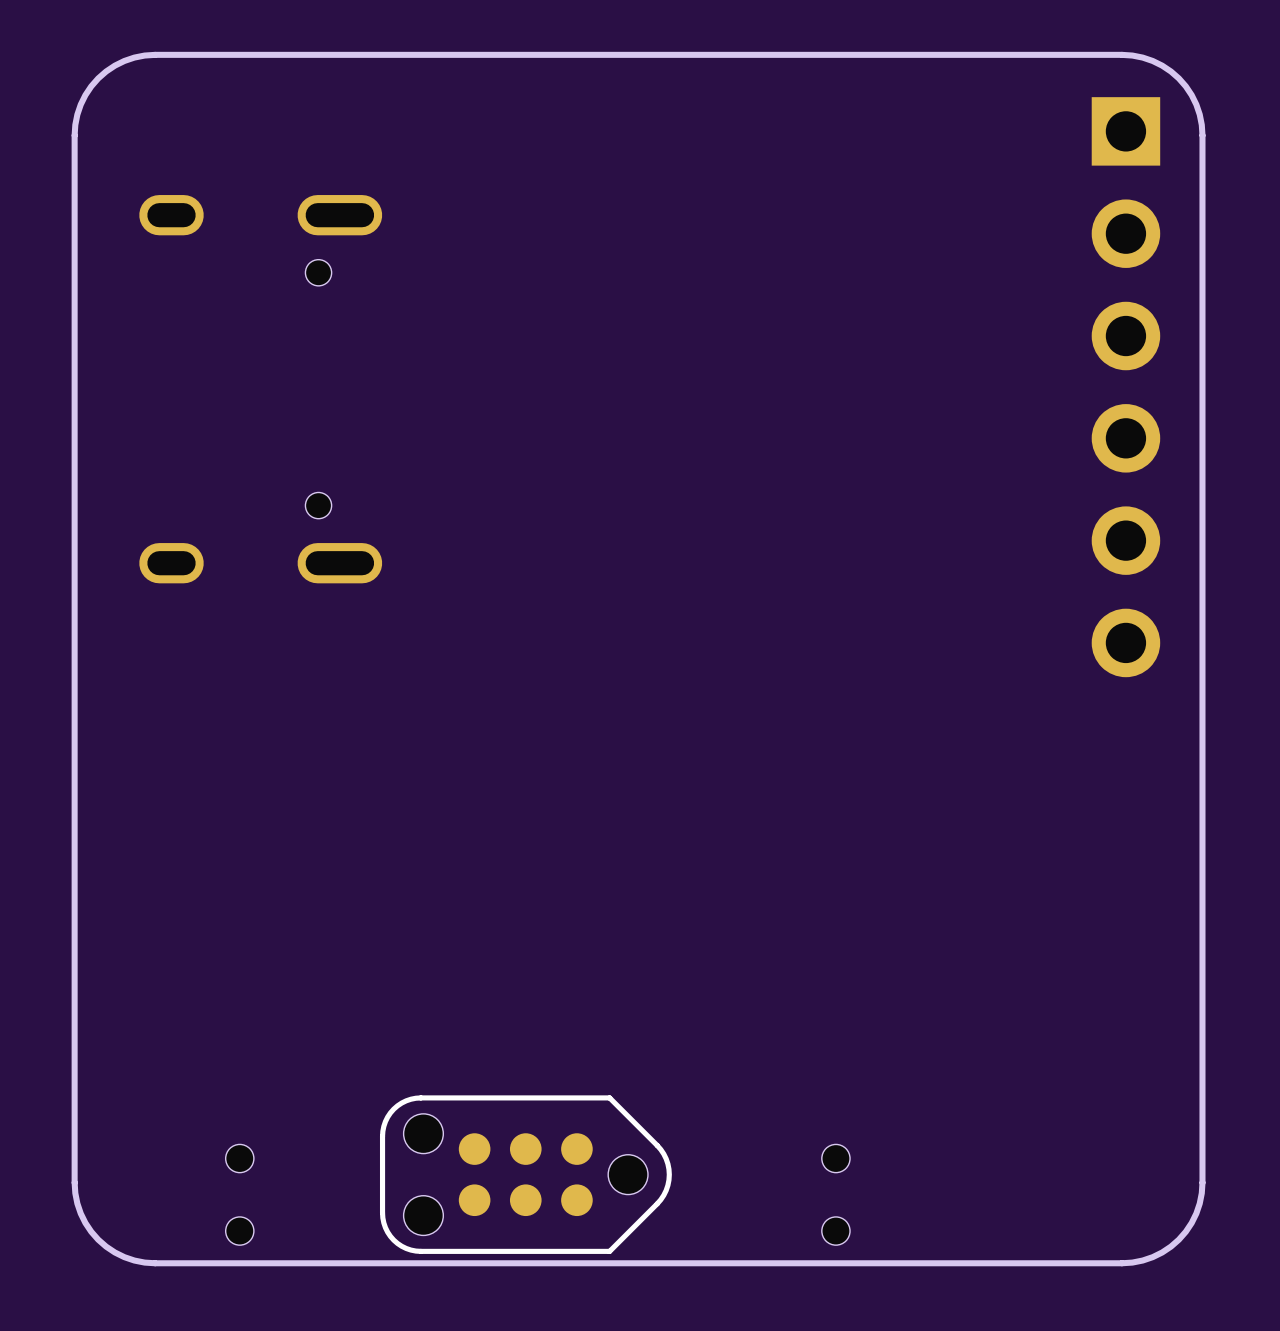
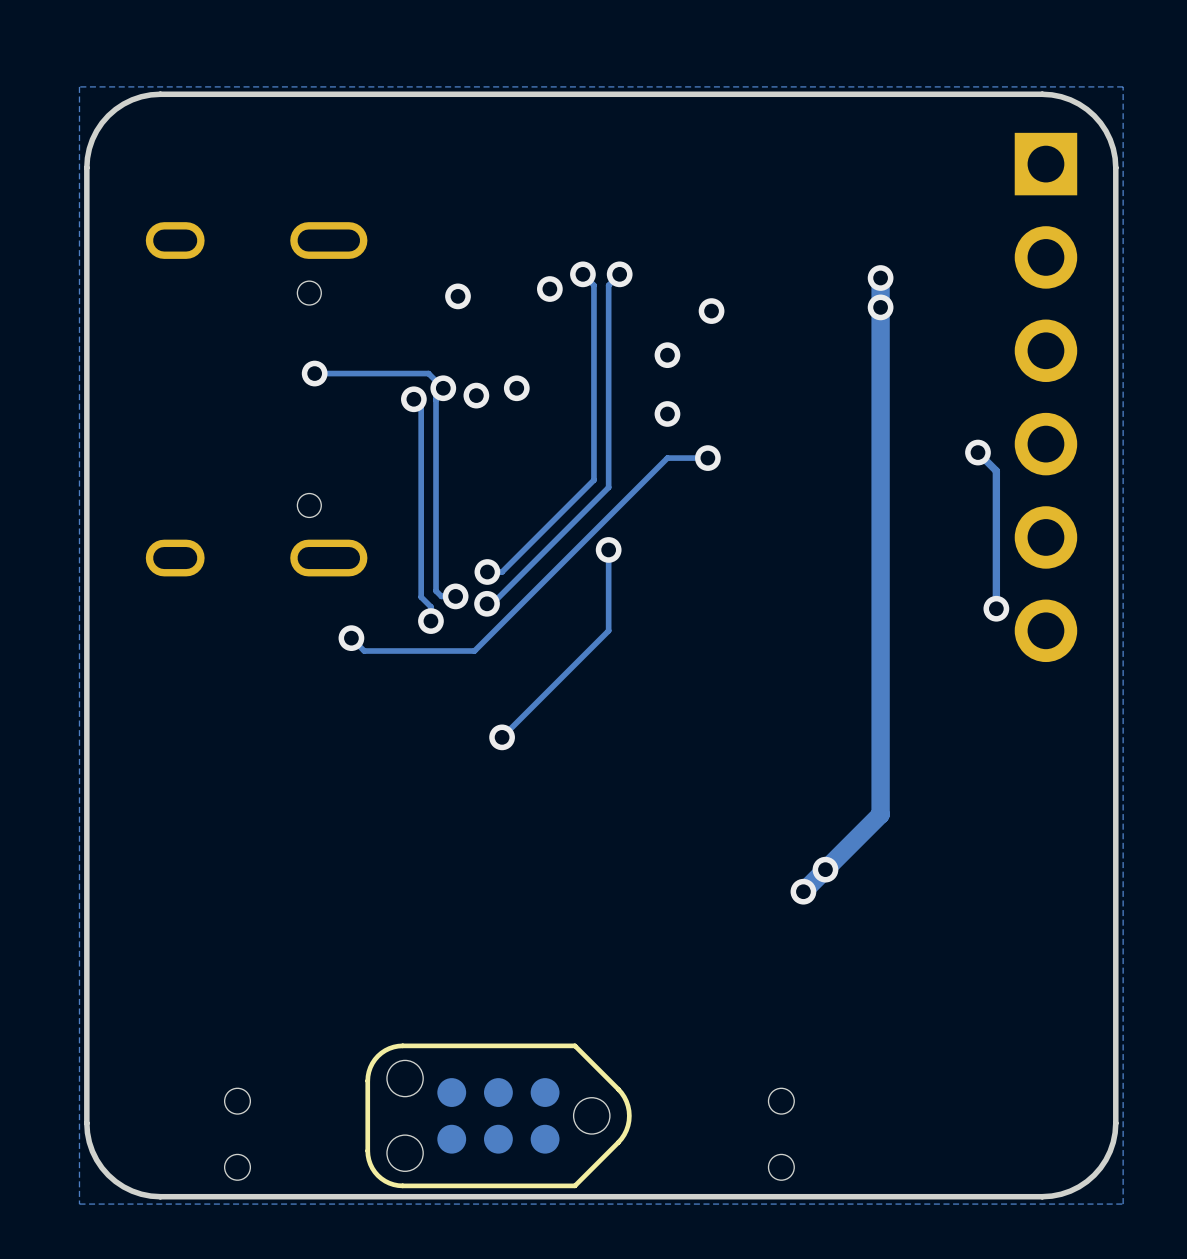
zone outline: none -> (1123, 86) (1123, 1204) (79, 1204) (79, 86) (1123, 86)
track: none -> (582, 274) (593, 285) (593, 480) (502, 571) (487, 571)
via: none -> (582, 274)
track: none -> (619, 274) (608, 285) (608, 487) (492, 603) (487, 603)
via: none -> (619, 274)
track: none -> (880, 278) (880, 814) (803, 891)
via: none -> (880, 278)
via: none -> (549, 289)
via: none -> (457, 296)
via: none -> (880, 307)
via: none -> (711, 311)
via: none -> (667, 355)
track: none -> (314, 373) (428, 373) (443, 388) (436, 395) (436, 590) (441, 596) (455, 596)
via: none -> (314, 373)
via: none -> (443, 388)
via: none -> (516, 388)
via: none -> (476, 395)
via: none -> (413, 399)
track: none -> (421, 406) (421, 597) (430, 606) (430, 621)
via: none -> (667, 413)
track: none -> (977, 452) (996, 470) (996, 608)
via: none -> (977, 452)
track: none -> (707, 458) (667, 458) (474, 651) (364, 651) (351, 638)
via: none -> (707, 458)
track: none -> (608, 549) (608, 630) (502, 737)
via: none -> (608, 549)
via: none -> (487, 571)
via: none -> (455, 596)
via: none -> (487, 603)
via: none -> (996, 608)
via: none -> (430, 621)
via: none -> (351, 638)
via: none -> (502, 737)
via: none -> (825, 869)
via: none -> (803, 891)

